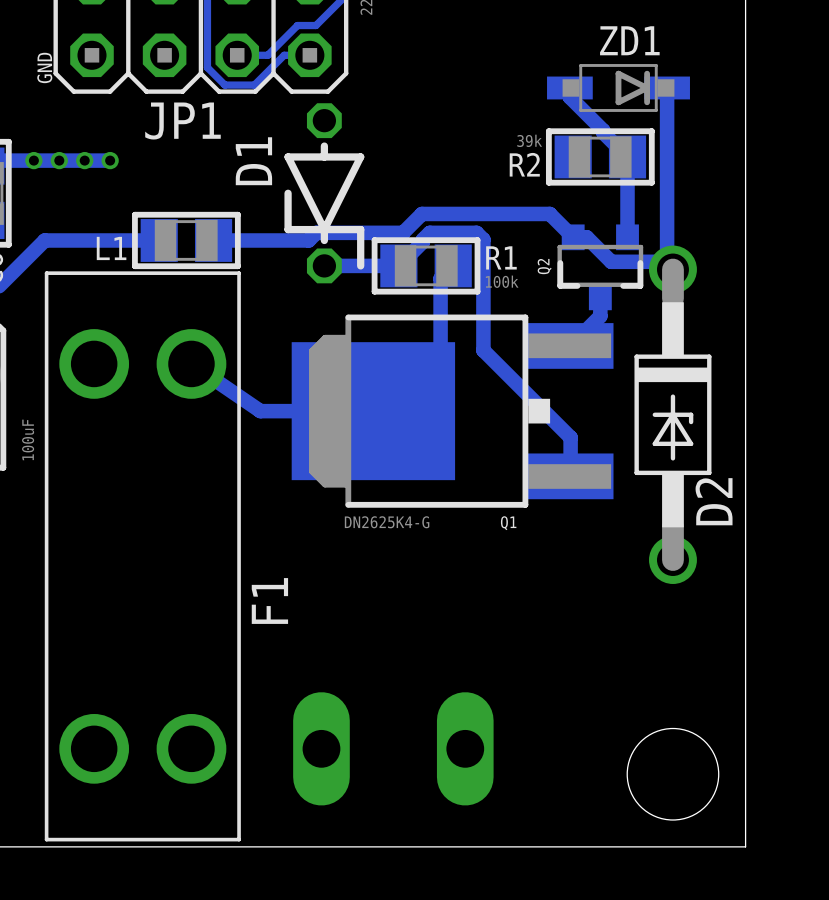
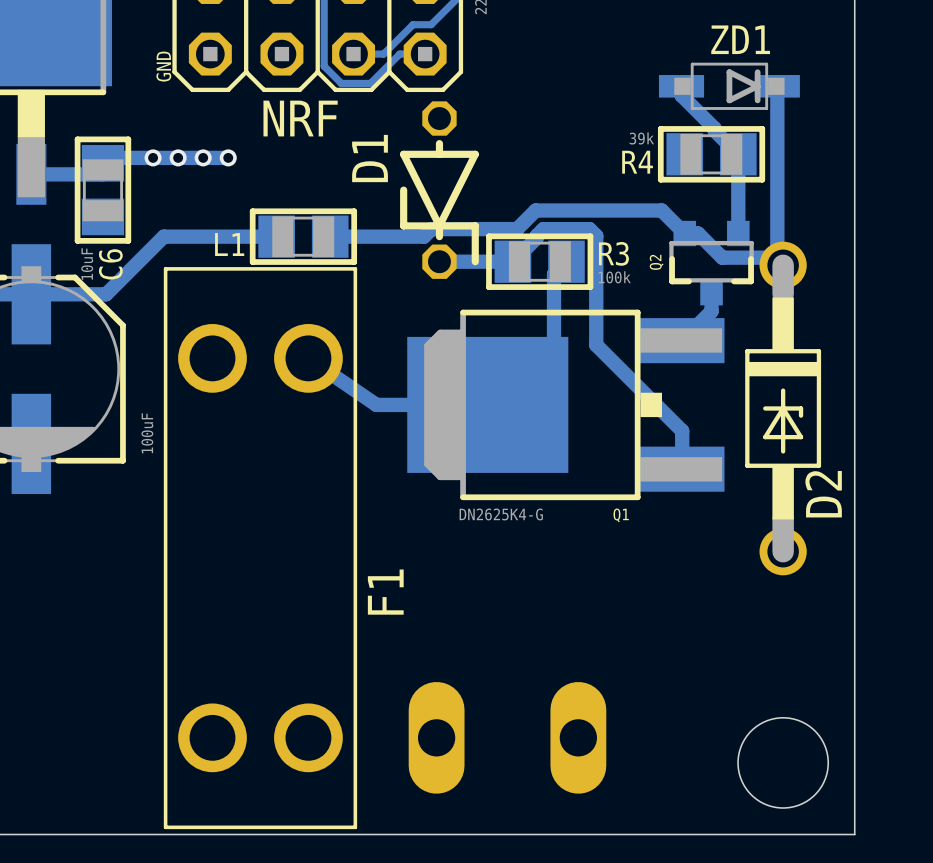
JP1 name: JP1 (182, 121) -> NRF (300, 118)
R2 name: R2 (524, 164) -> R4 (637, 162)
R1 name: R1 (501, 257) -> R3 (613, 253)

